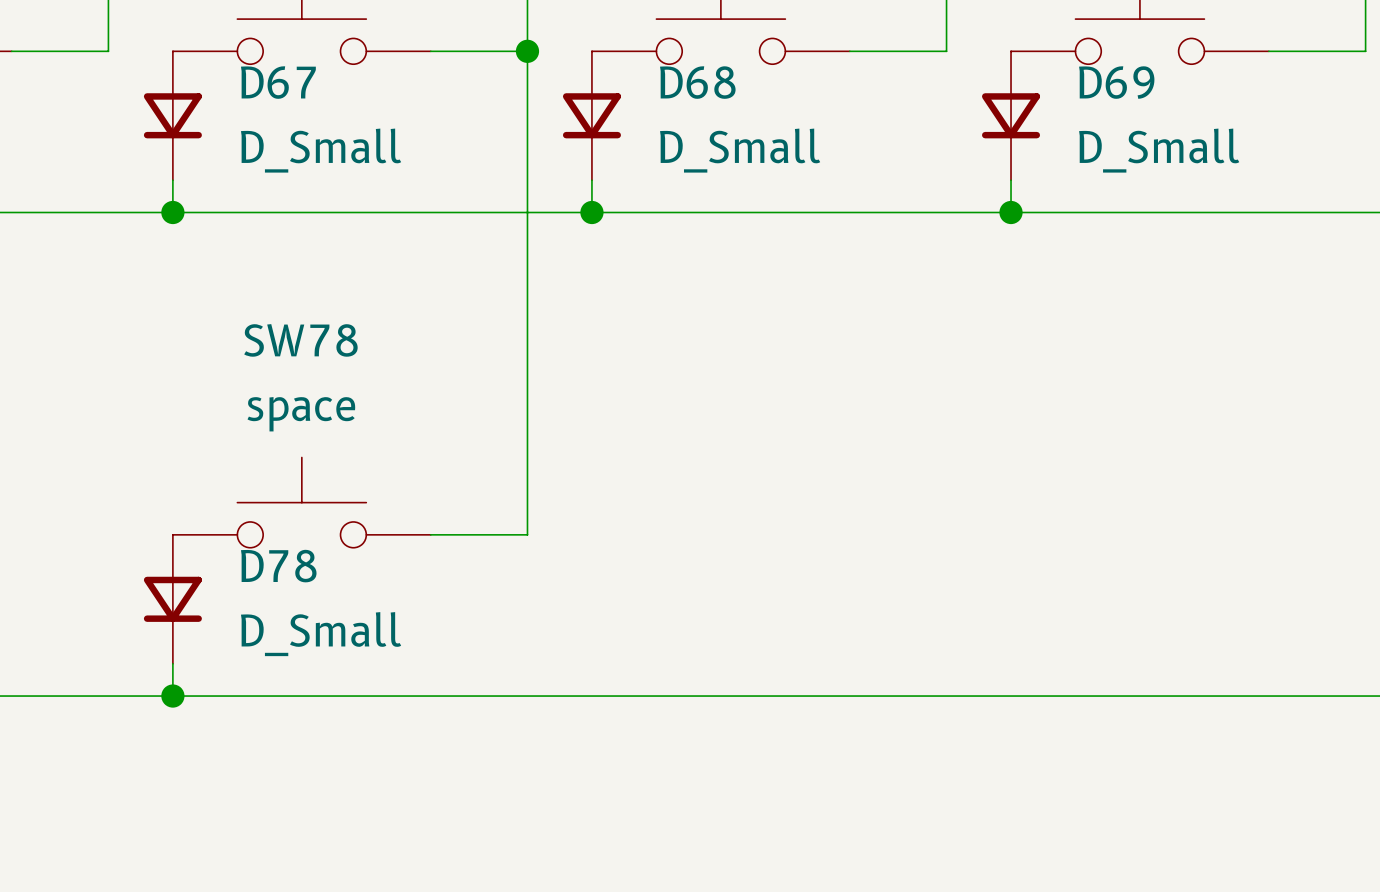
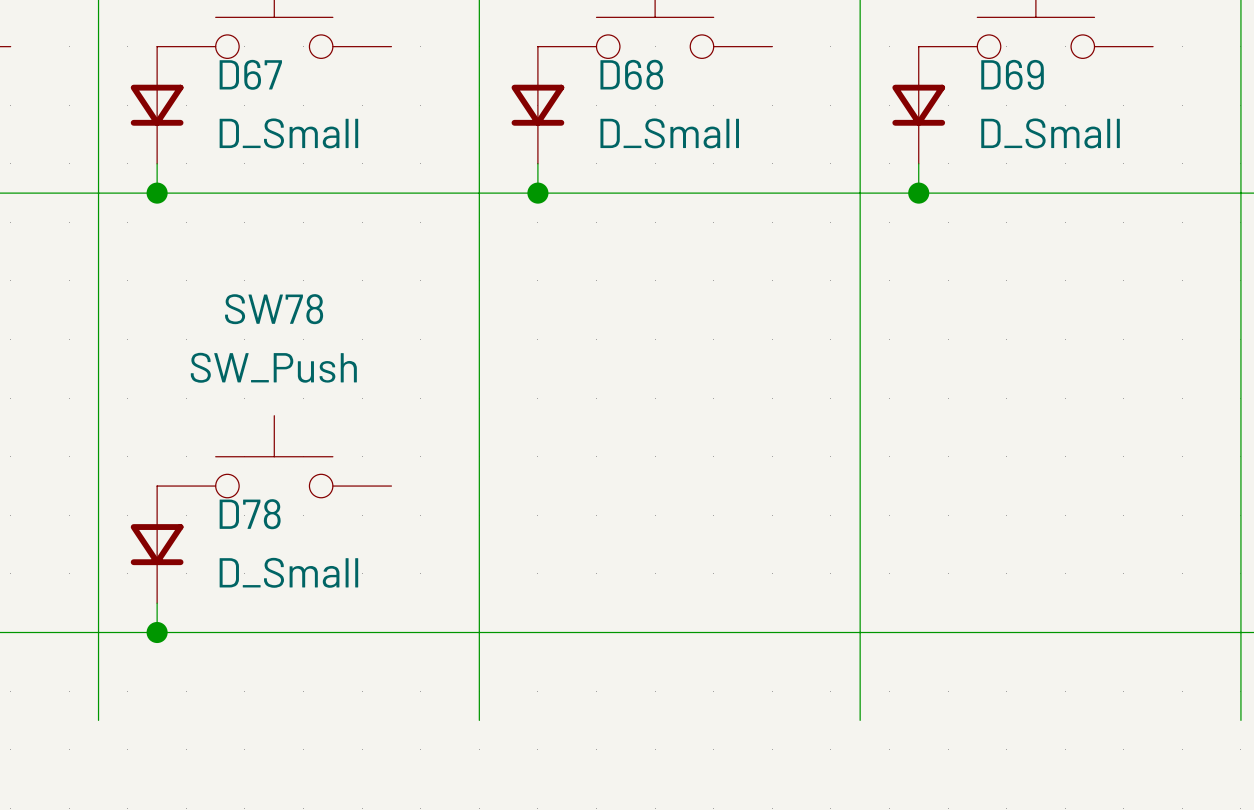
wire: (11, 51) (108, 51) -> (98, 720) (98, 46)
wire: (430, 51) (527, 51) -> none
junction: (527, 51) -> none
wire: (849, 51) (946, 51) -> (860, 720) (860, 46)
wire: (1268, 51) (1365, 51) -> (1240, 720) (1240, 46)
SW78 value: space (301, 414) -> SW_Push (273, 367)
wire: (430, 534) (527, 534) -> (479, 720) (479, 486)

